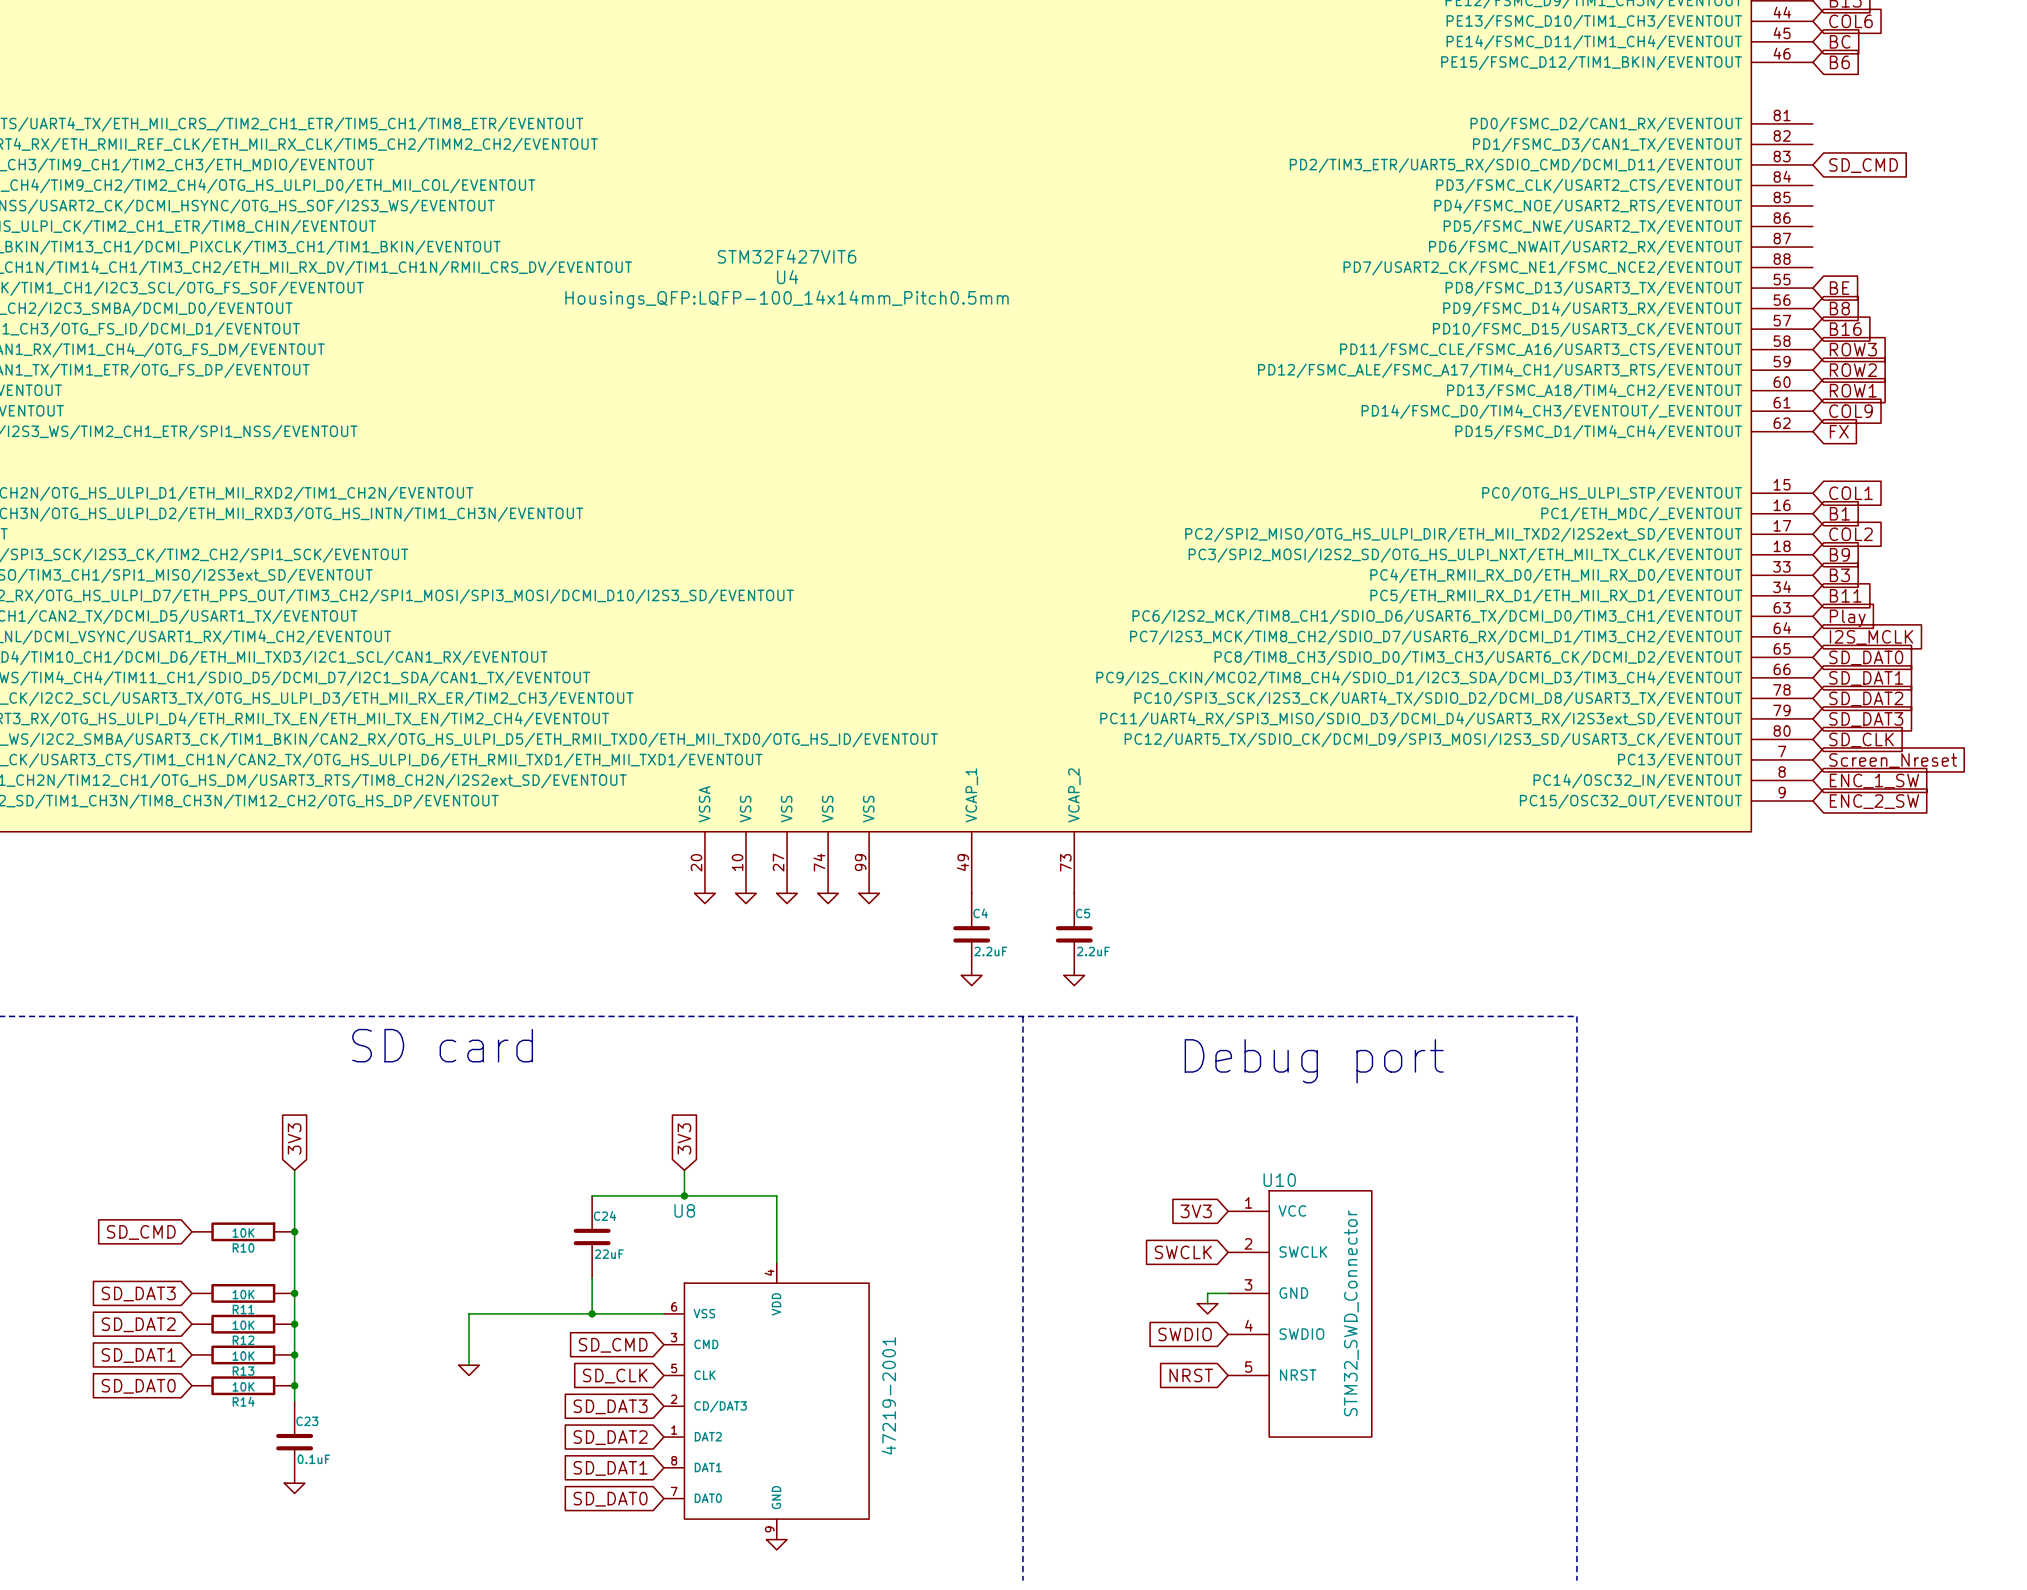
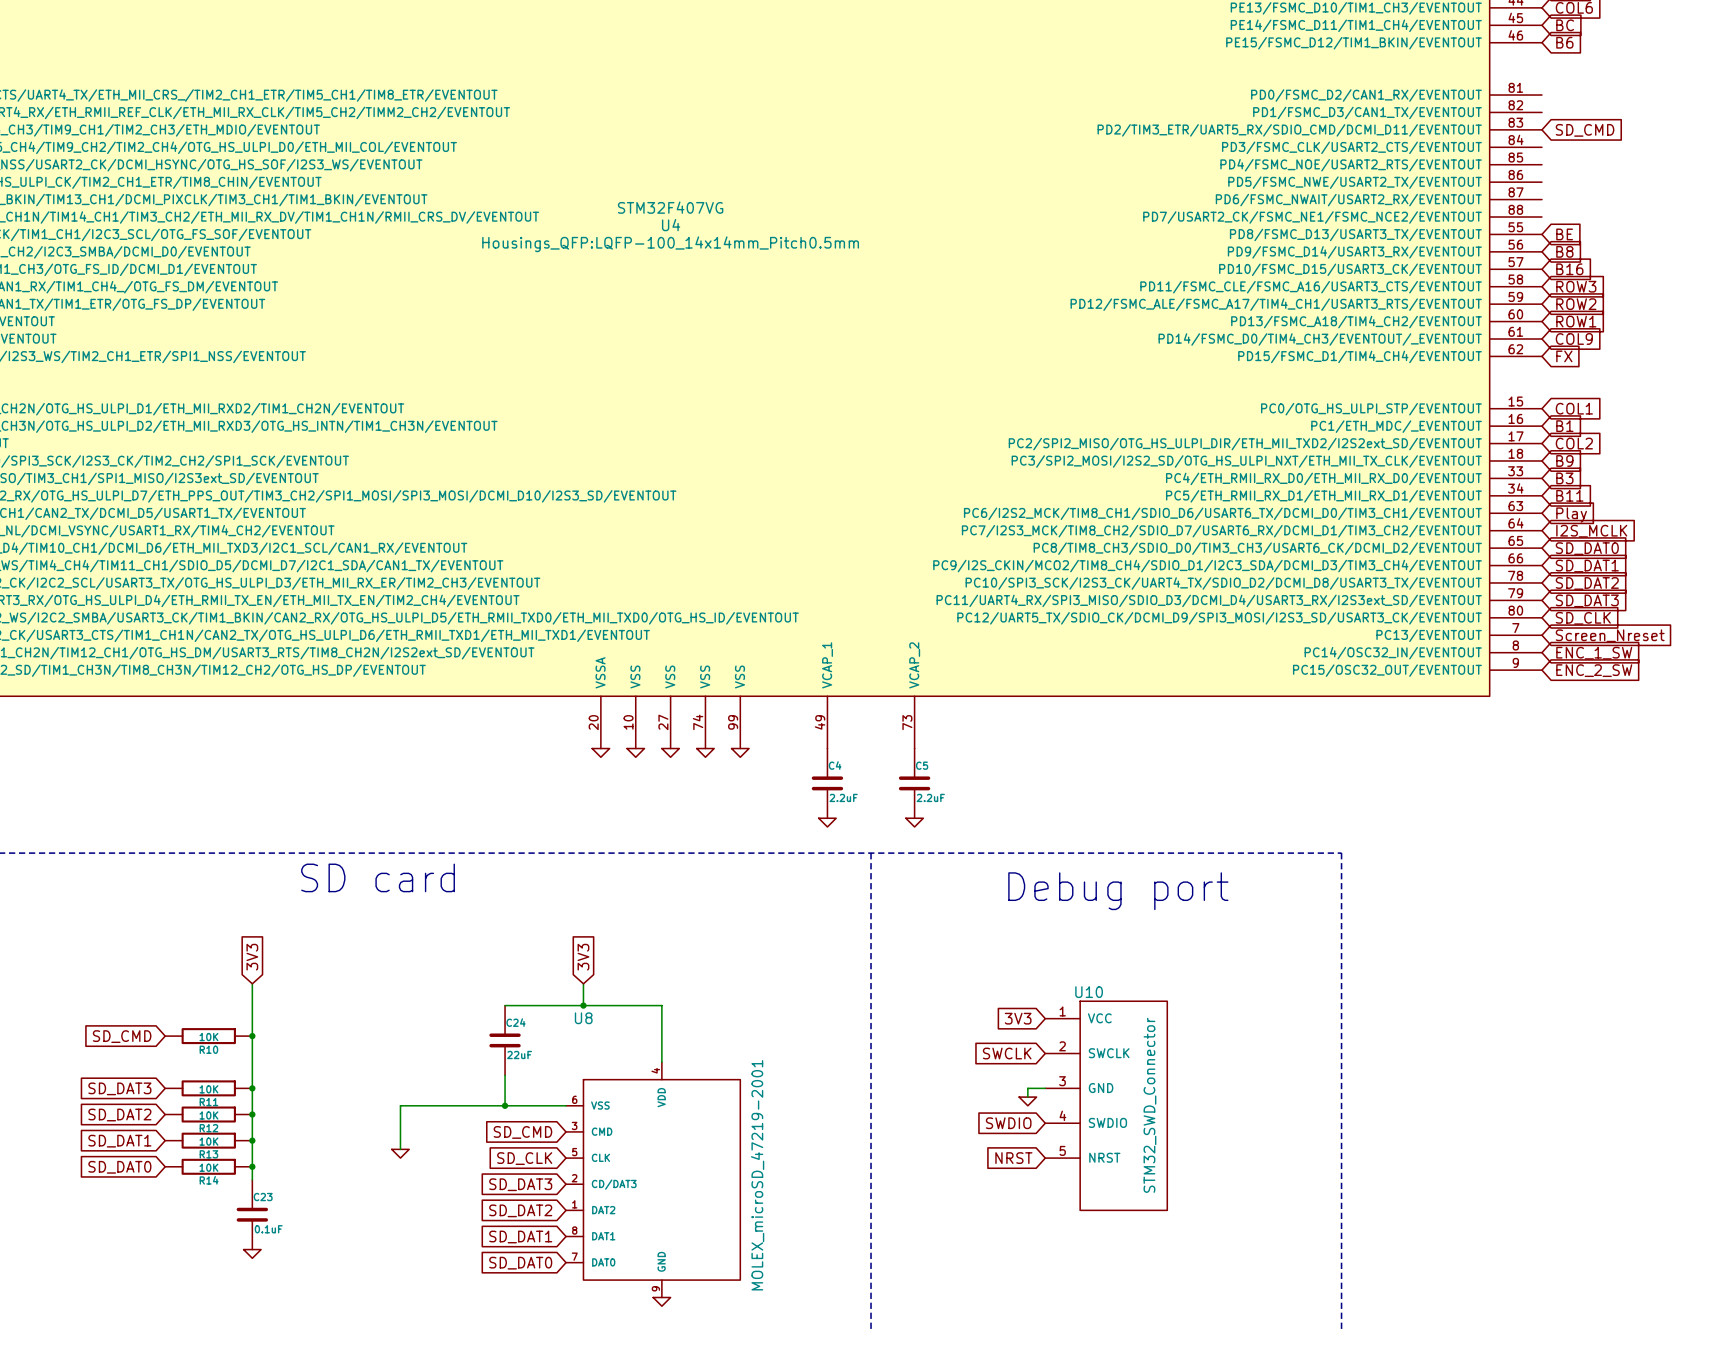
U4 value: STM32F427VIT6 (787, 256) -> STM32F407VG (670, 207)
U8 value: 47219-2001 (888, 1396) -> MOLEX_microSD_47219-2001 (757, 1175)

